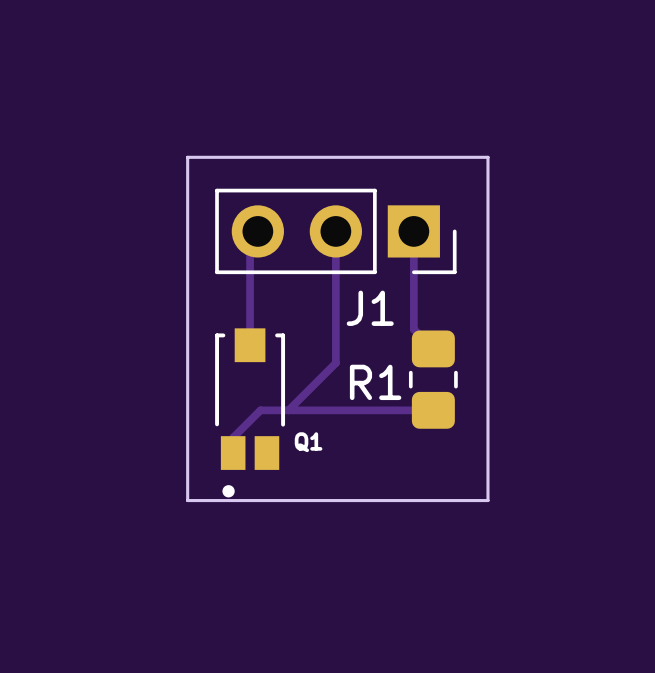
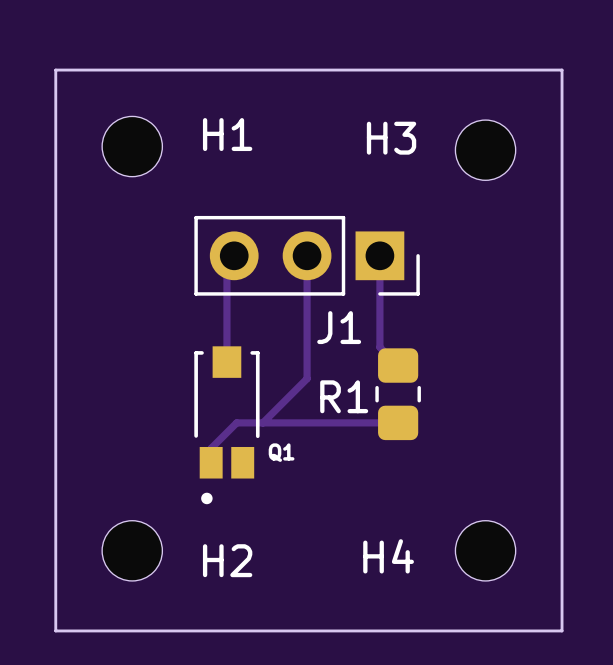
board edge: none -> (55, 70) (562, 70) (562, 630) (55, 630) (55, 70)
H1: none -> (132, 146)
H3: none -> (485, 150)
board edge: (187, 157) (487, 157) (487, 500) (187, 500) (187, 157) -> none
H2: none -> (132, 550)
H4: none -> (485, 550)

